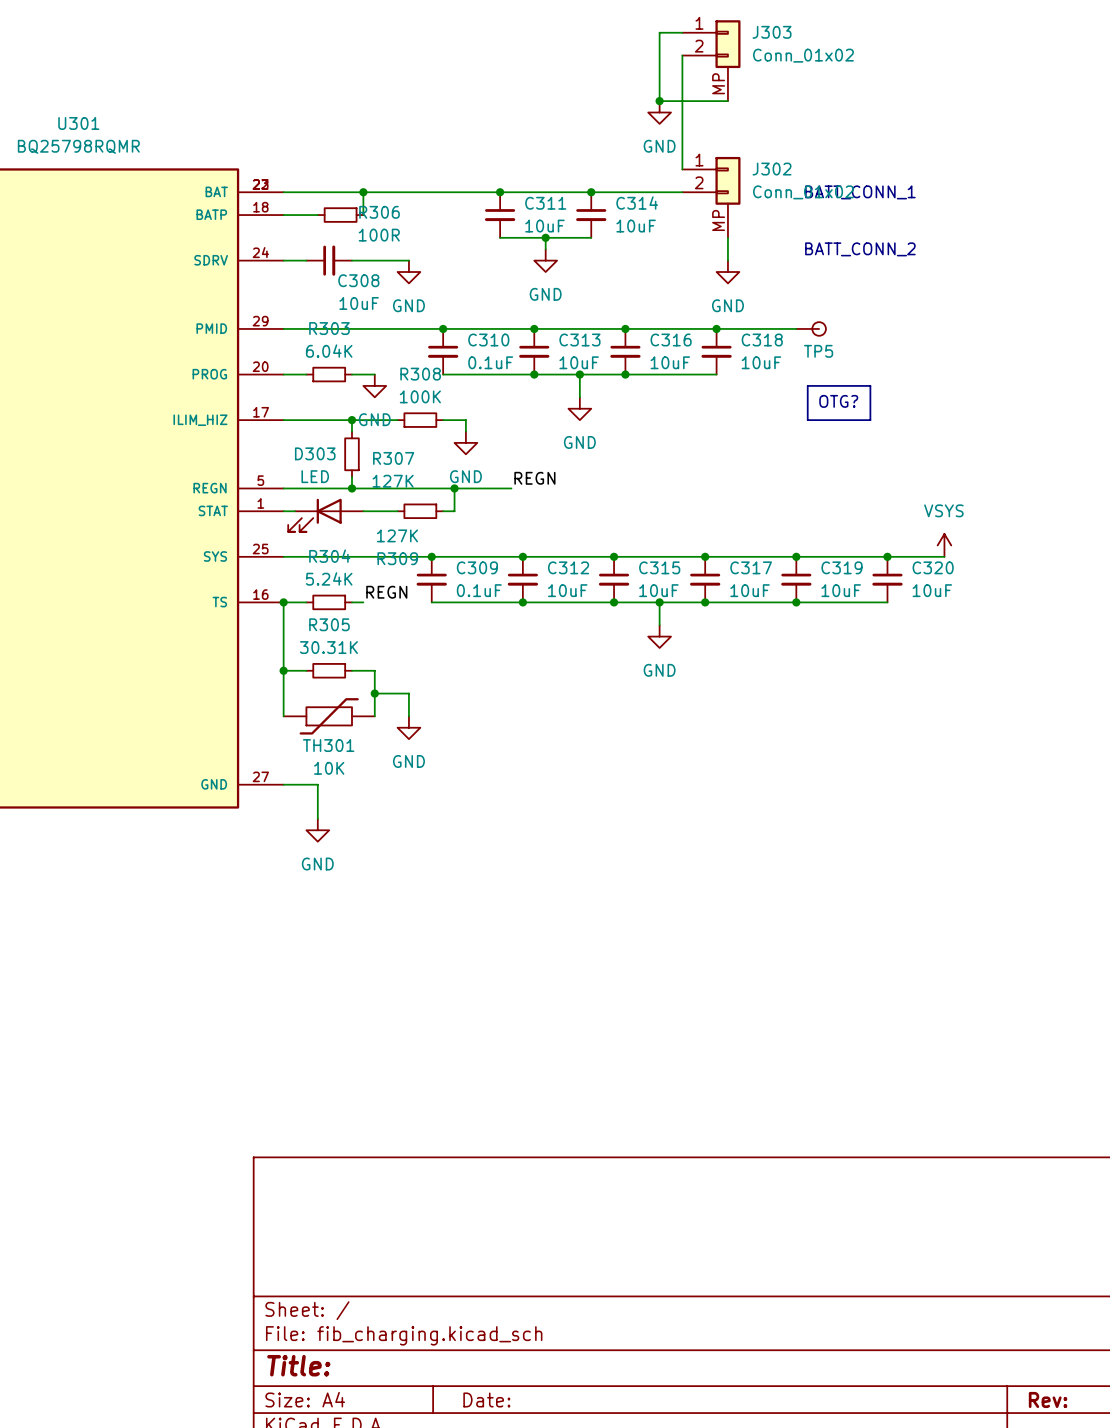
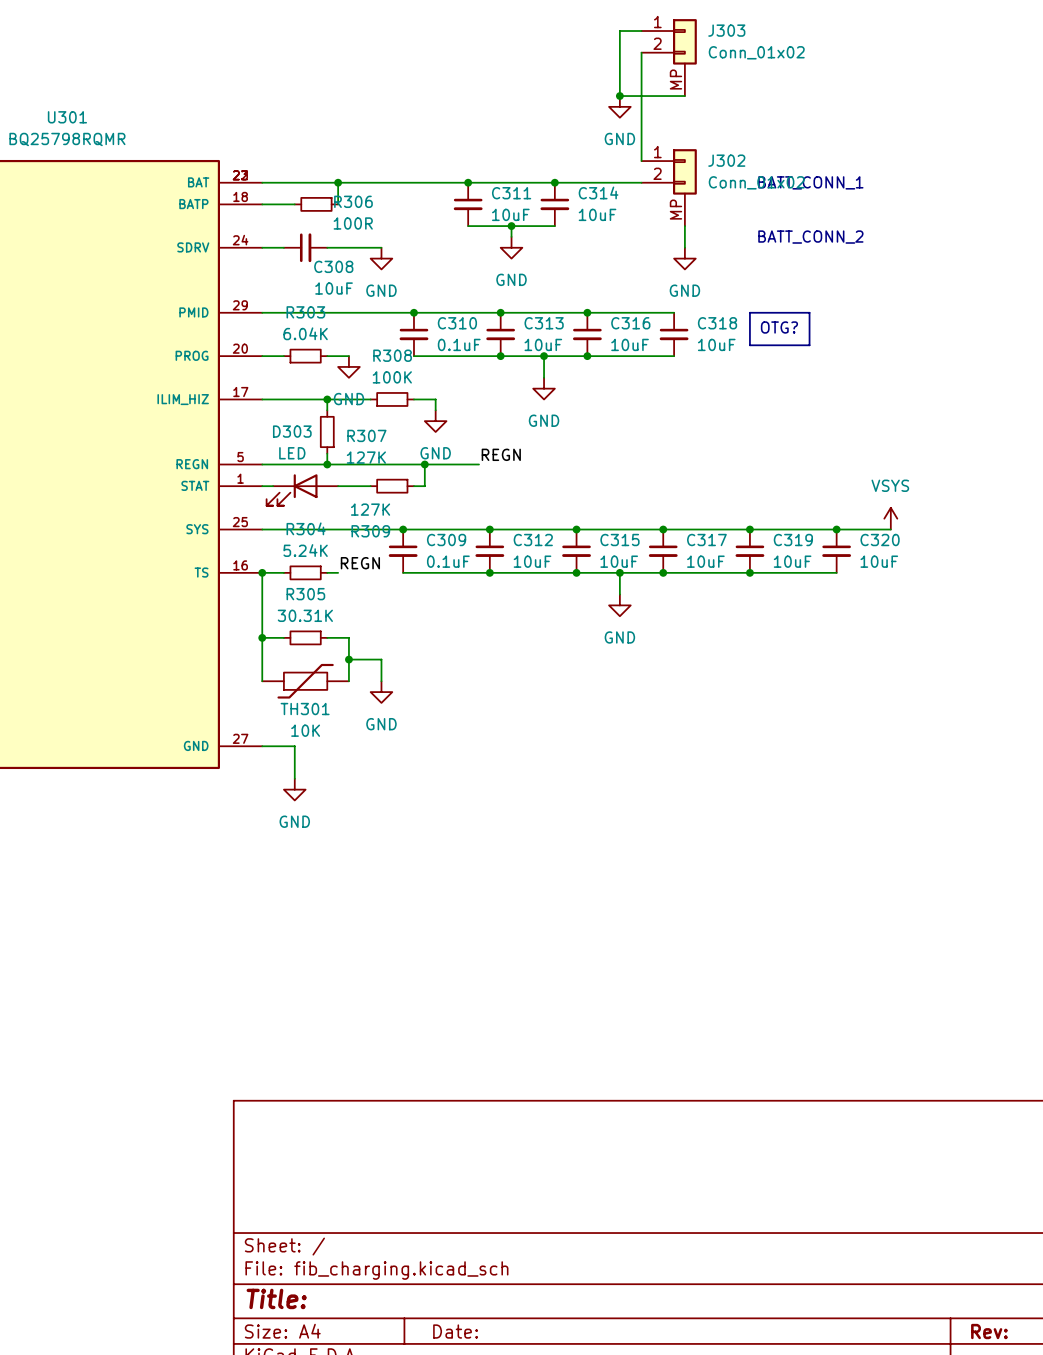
wire: (716, 328) (796, 328) -> none
junction: (716, 328) -> none
TP5: (811, 328) -> none
line: (807, 385) (870, 385) (870, 420) (807, 420) (807, 385) -> (749, 312) (809, 312) (809, 345) (749, 345) (749, 312)
text position: OTG? (838, 401) -> OTG? (779, 327)

